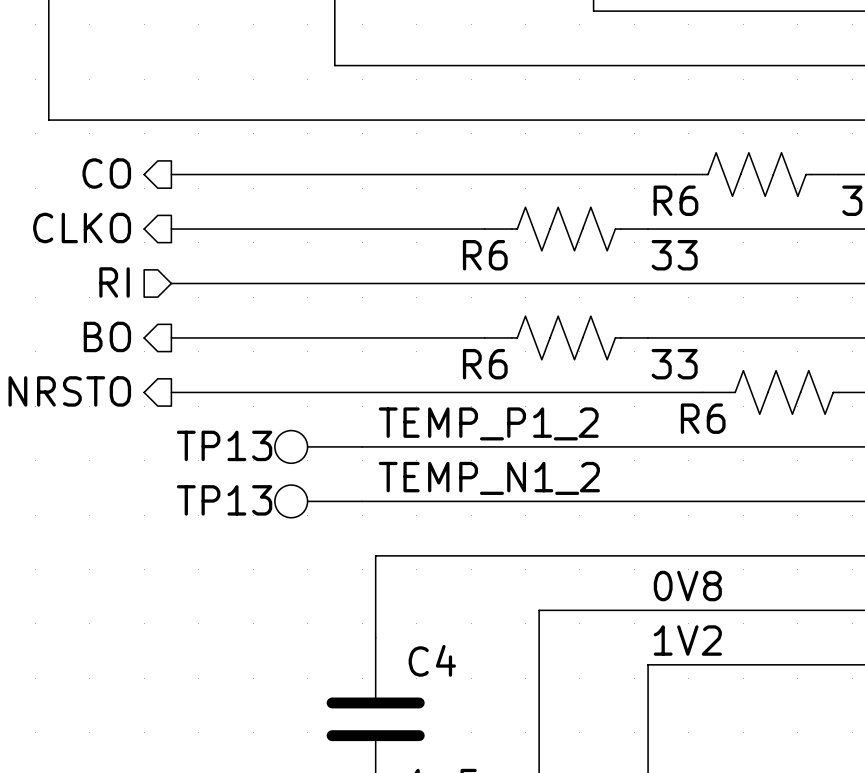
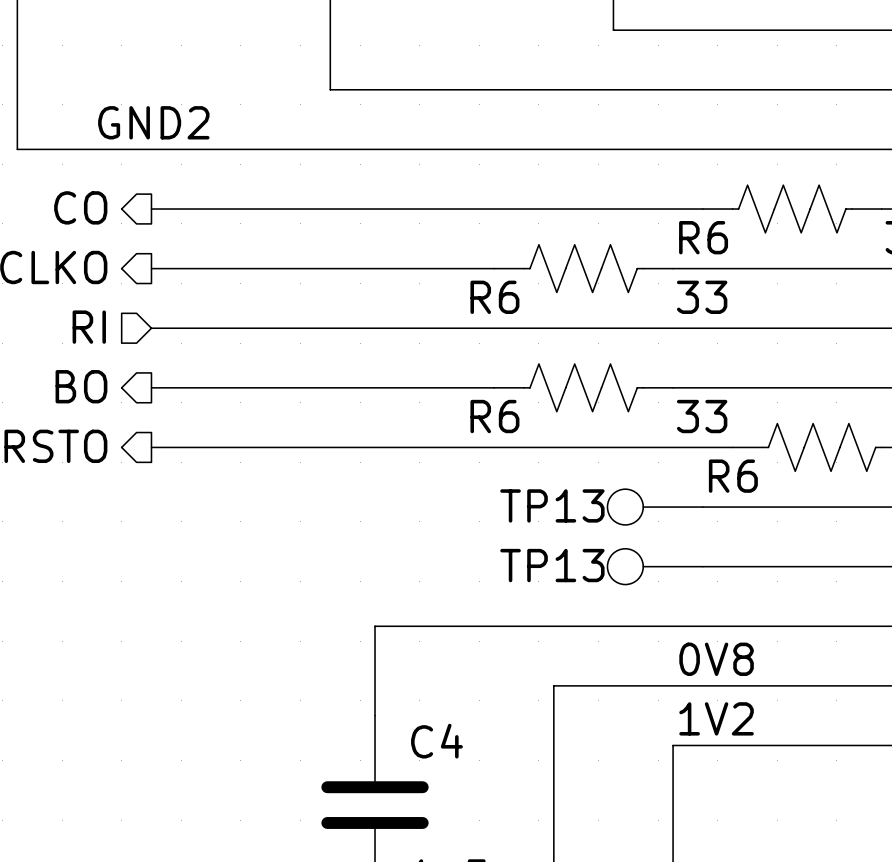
label: none -> GND2 (153, 122)
label: TEMP_P1_2 (488, 423) -> none
TP13: (318, 446) -> none
wire: (362, 446) (675, 446) -> none
TP13: none -> (655, 507)
label: TEMP_N1_2 (489, 478) -> none
TP13: (318, 501) -> none
wire: (362, 501) (675, 501) -> none
TP13: none -> (655, 566)

